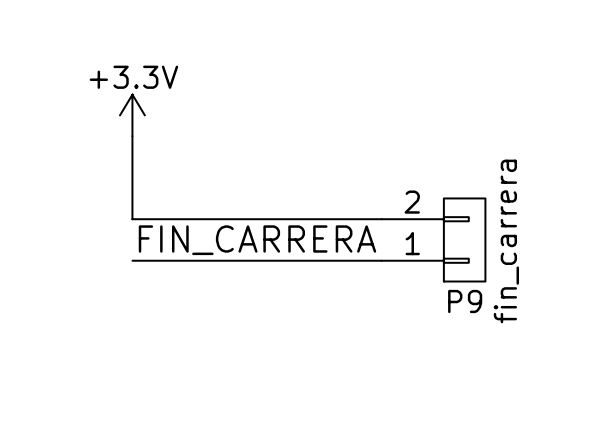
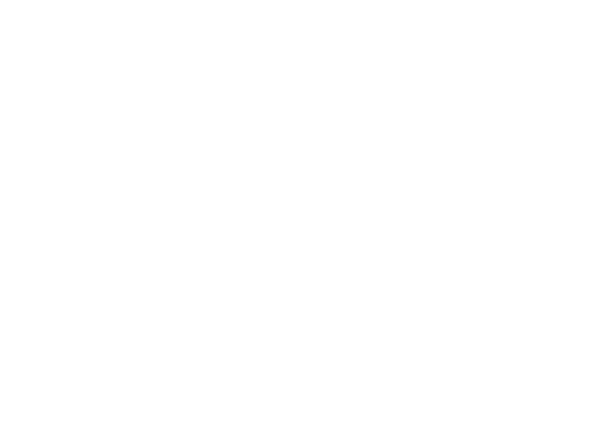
power symbol: +3.3V (132, 115) -> none
wire: (132, 136) (132, 219) (381, 219) -> none
P9: fin_carrera (433, 239) -> none
label: FIN_CARRERA (257, 240) -> none
wire: (132, 260) (381, 260) -> none

